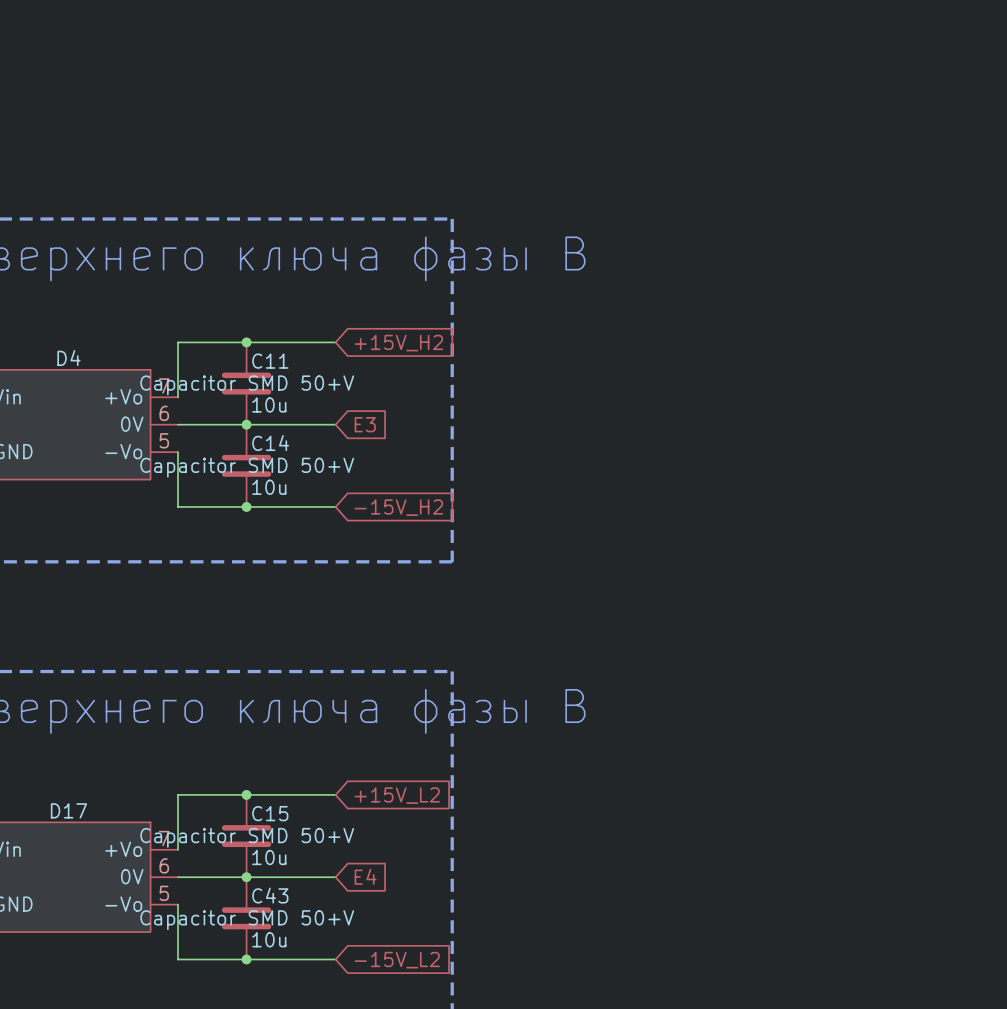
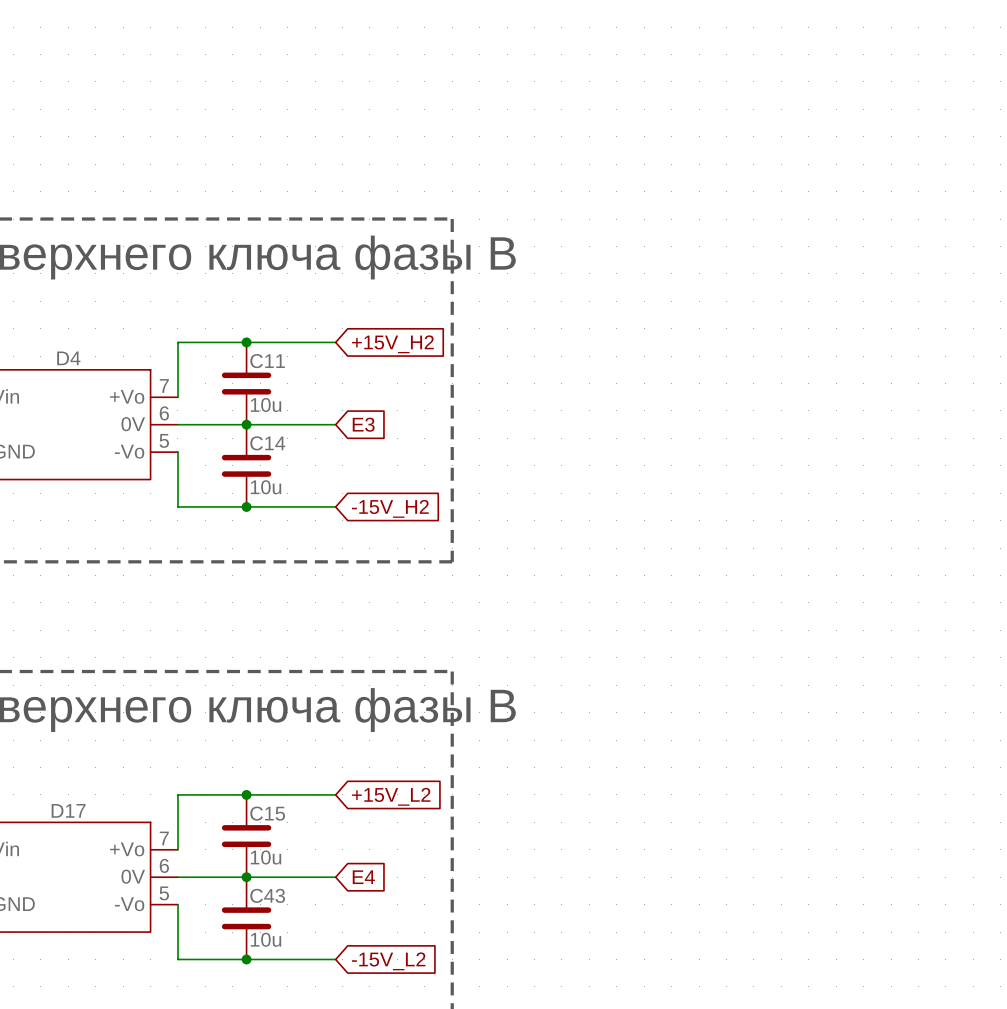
C11 text: Capacitor SMD 50+V (247, 385) -> none
C14 text: Capacitor SMD 50+V (247, 467) -> none
C15 text: Capacitor SMD 50+V (247, 837) -> none
C43 text: Capacitor SMD 50+V (247, 920) -> none

